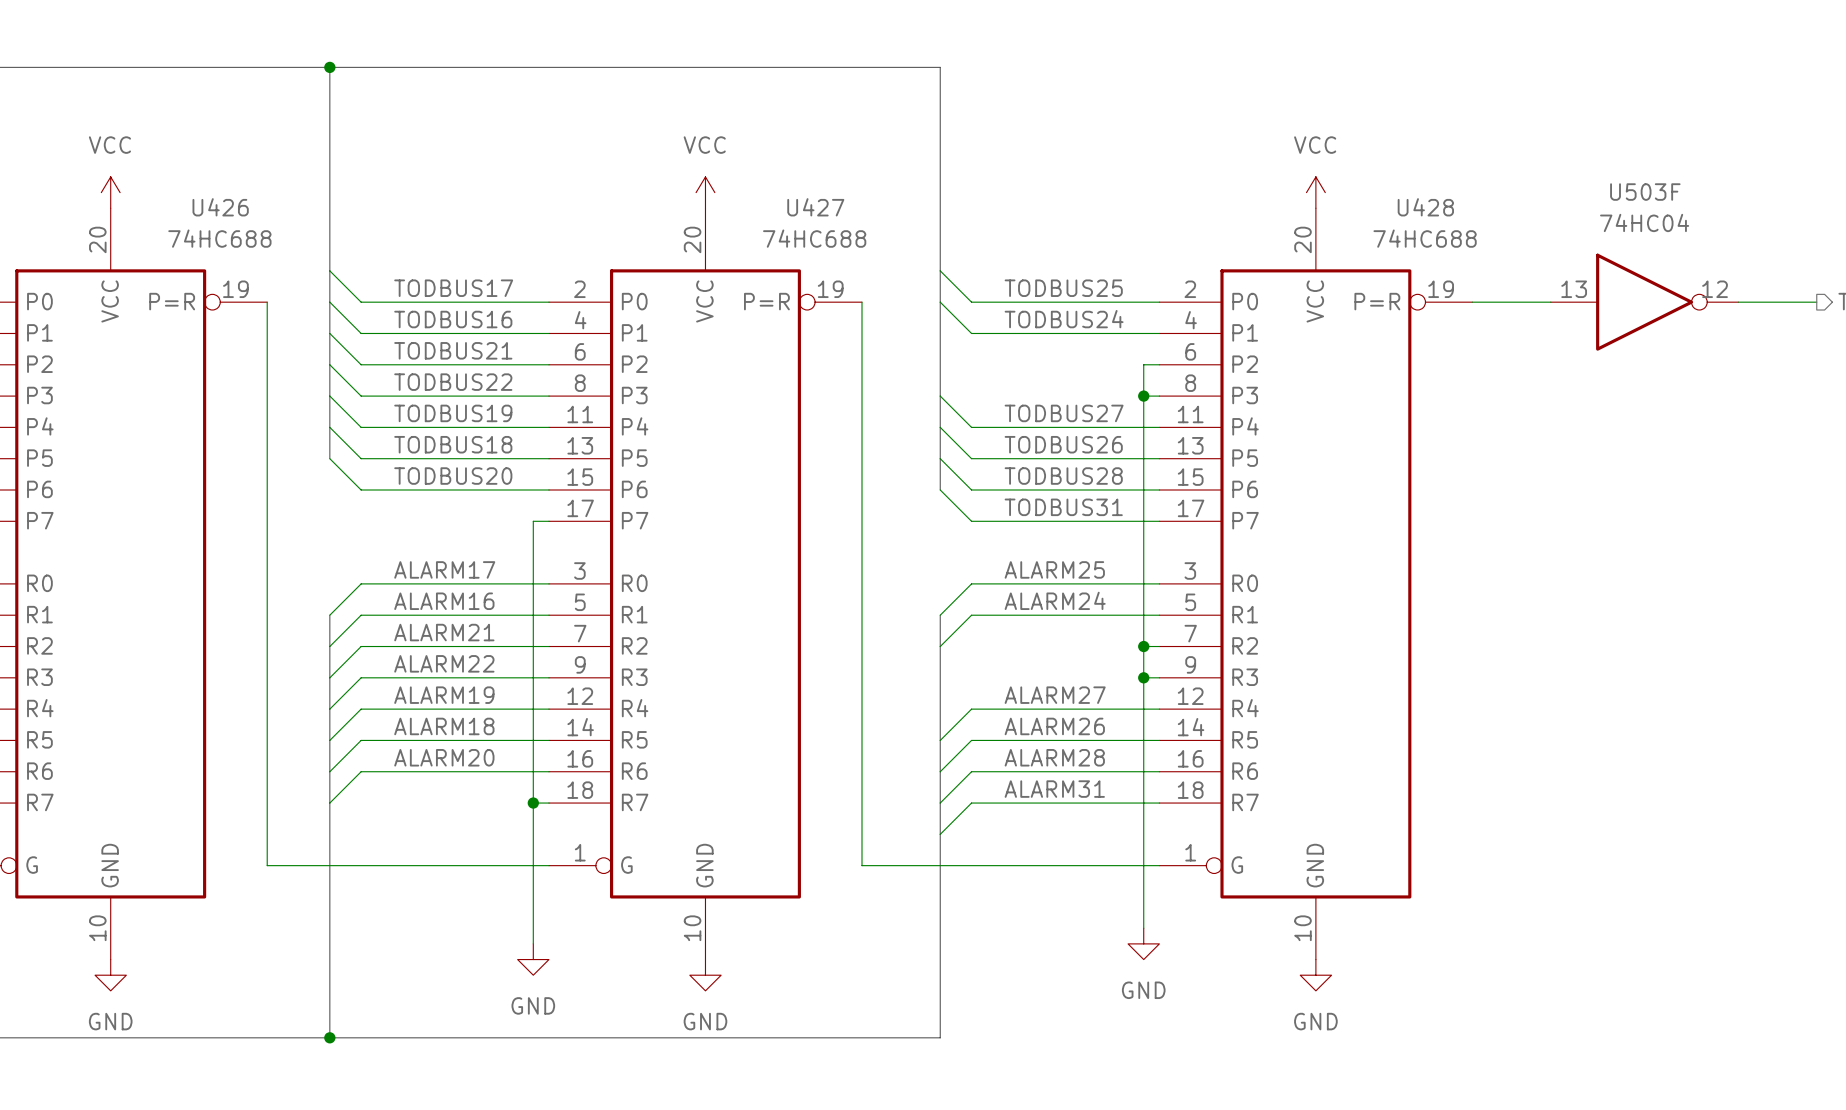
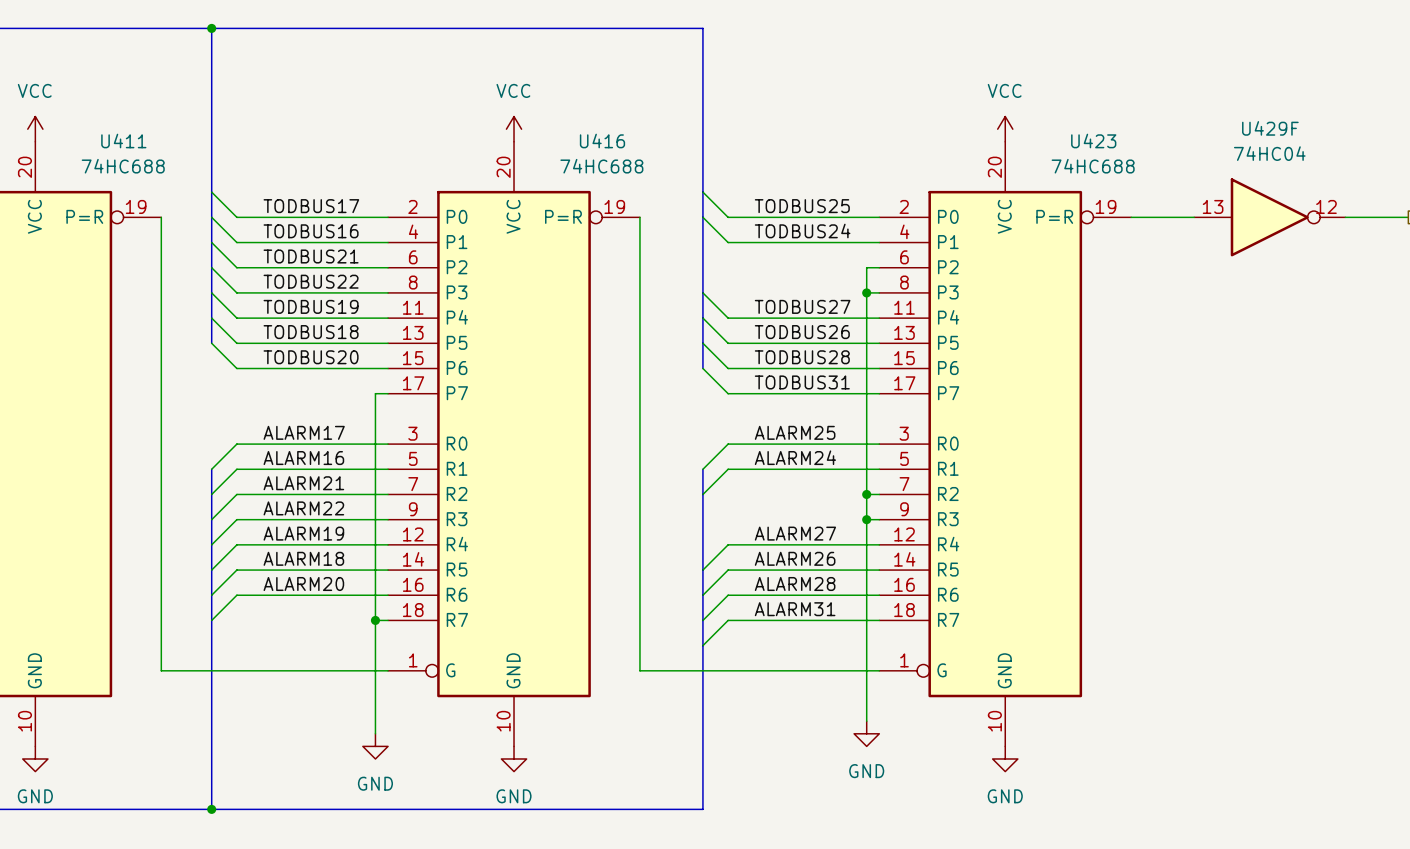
U503F name: U503F (1645, 192) -> U429F (1270, 128)
U426 name: U426 (220, 207) -> U411 (123, 141)
U427 name: U427 (815, 207) -> U416 (602, 141)
U428 name: U428 (1425, 207) -> U423 (1093, 141)

